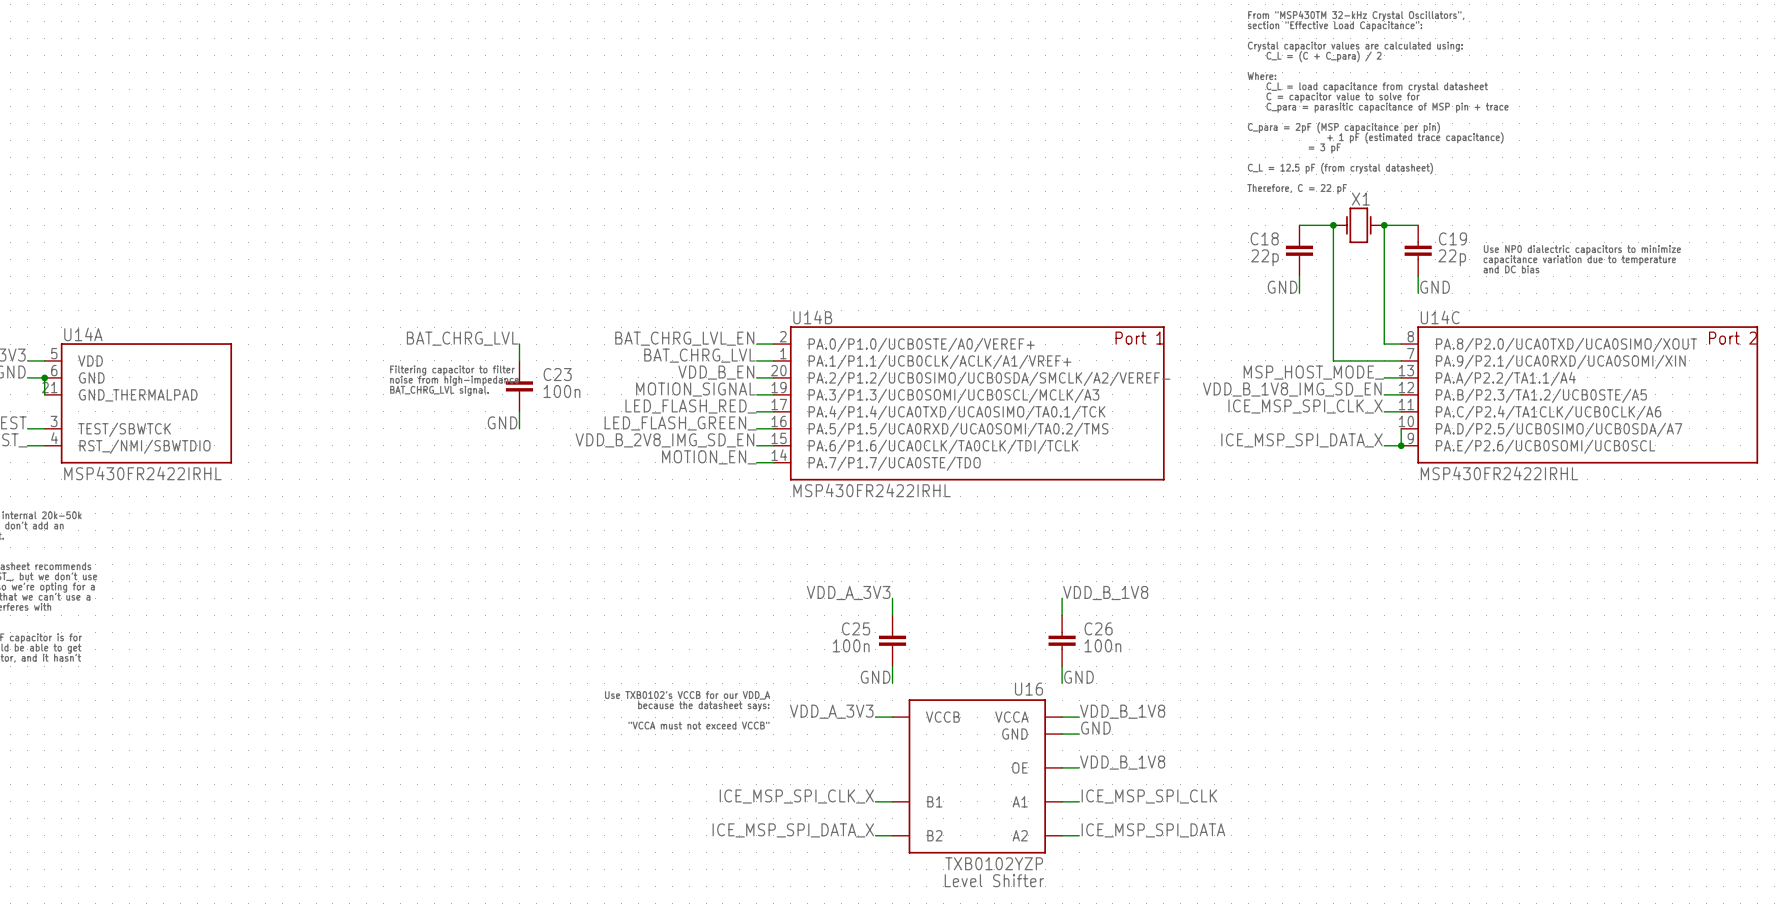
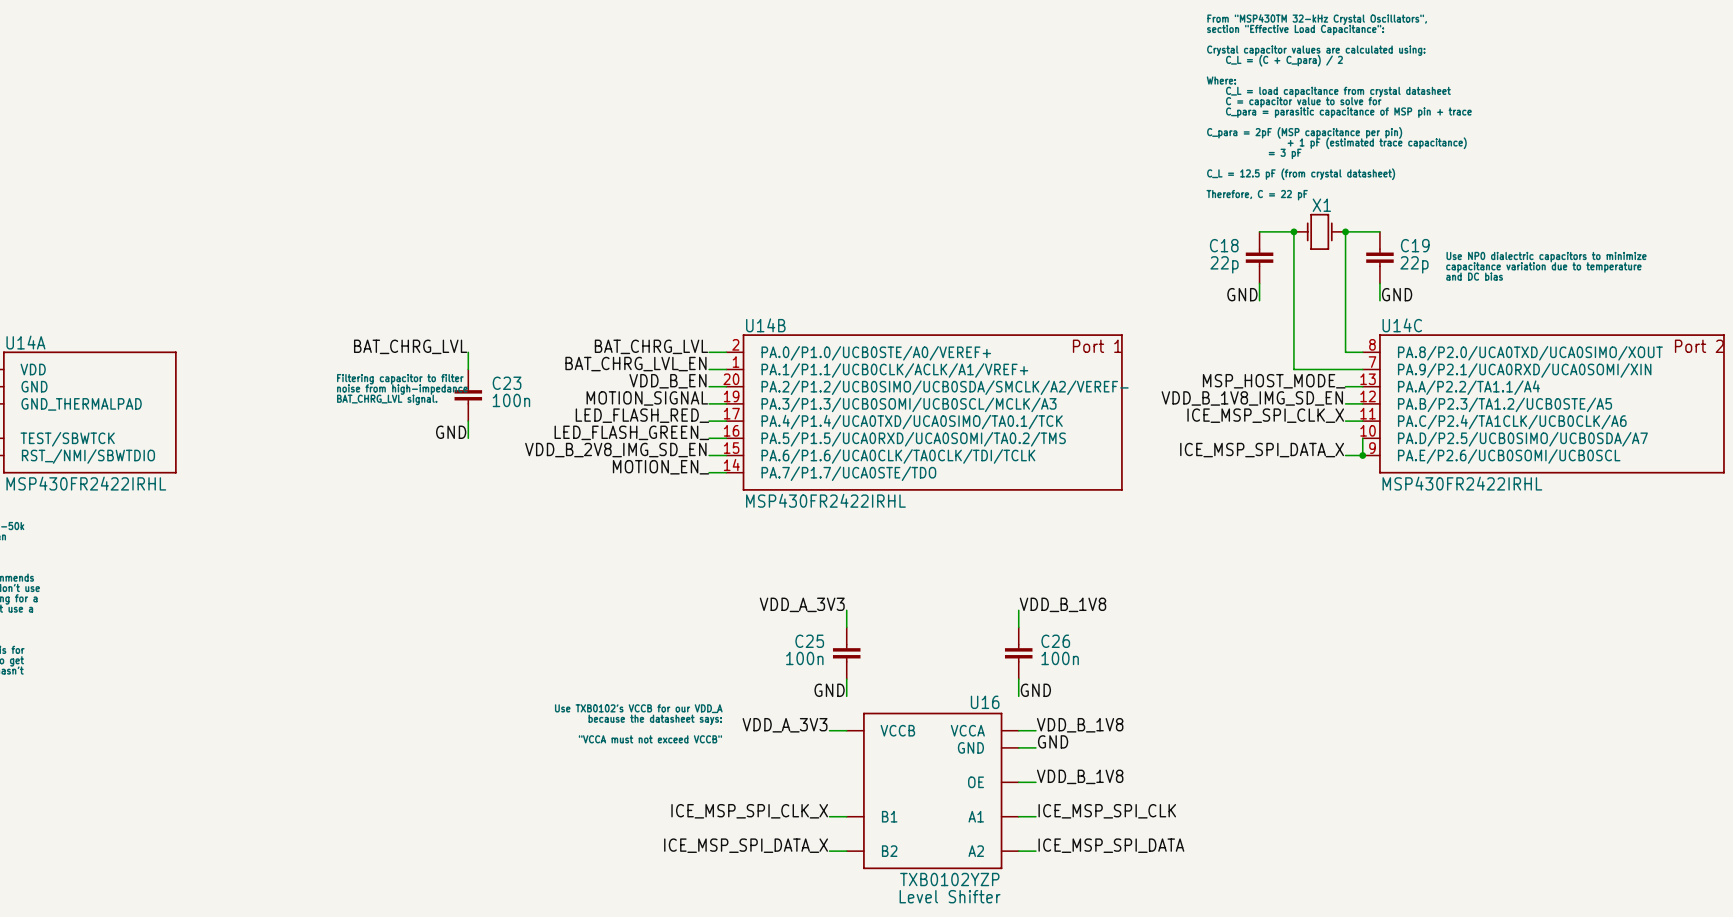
label: BAT_CHRG_LVL_EN (684, 338) -> BAT_CHRG_LVL (651, 346)
label: BAT_CHRG_LVL (700, 355) -> BAT_CHRG_LVL_EN (635, 364)

